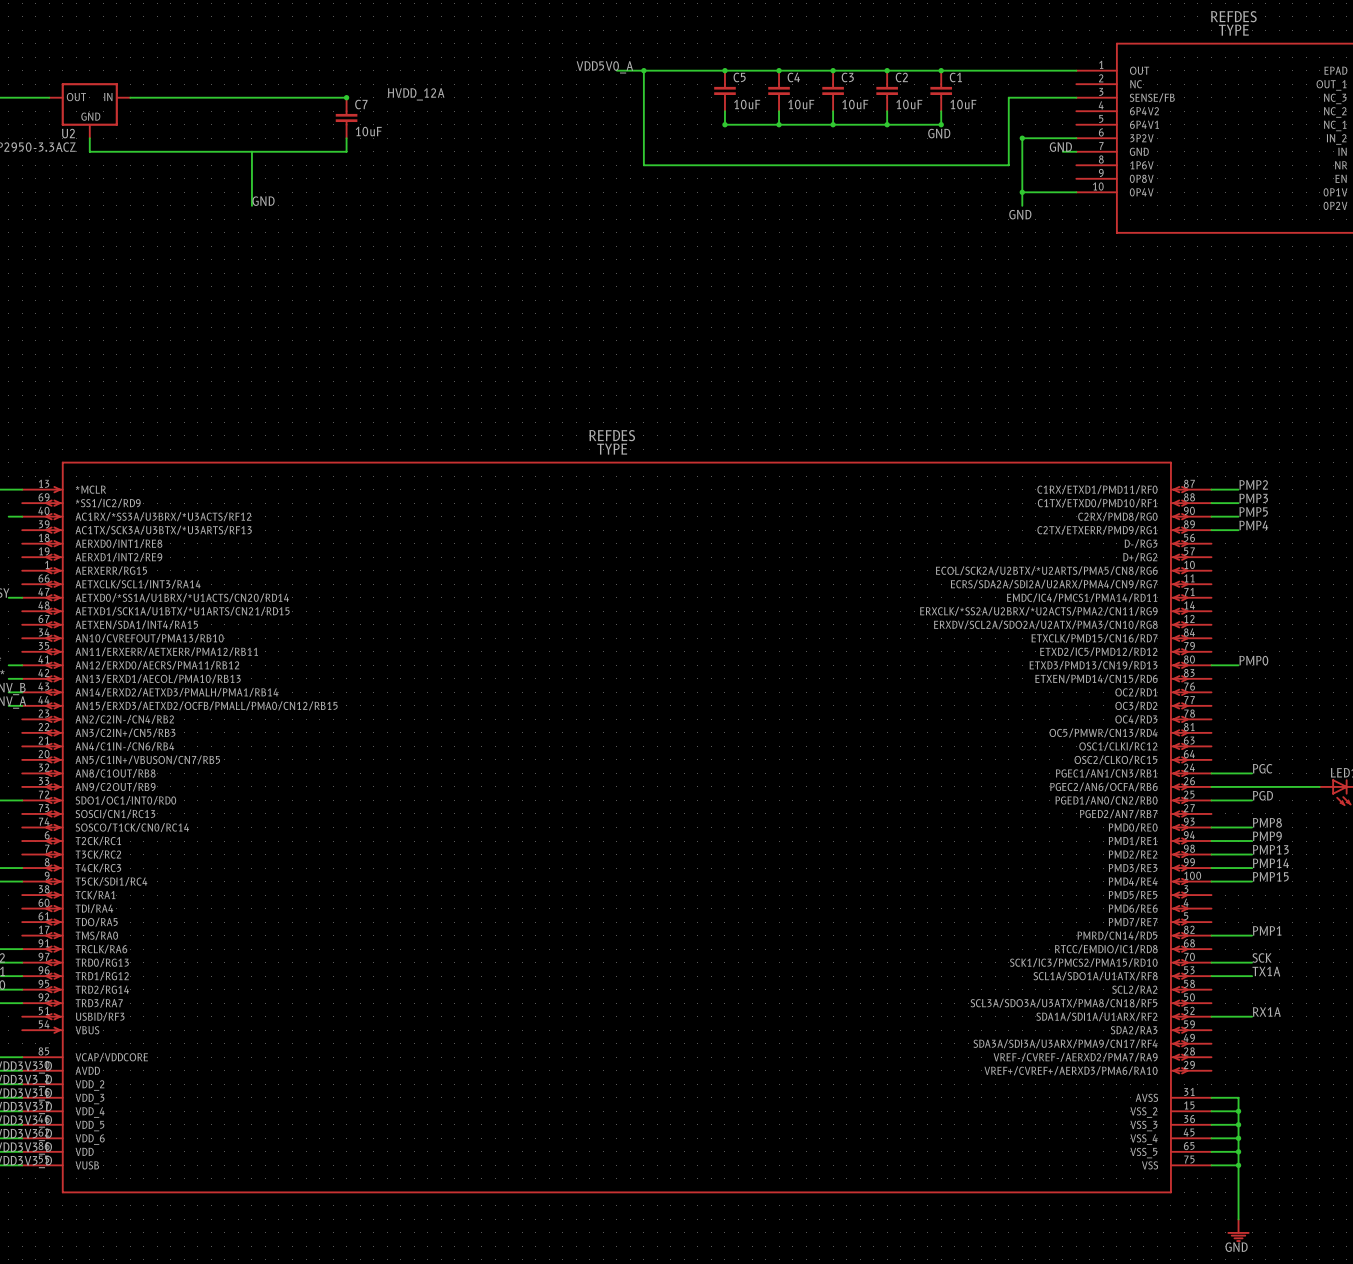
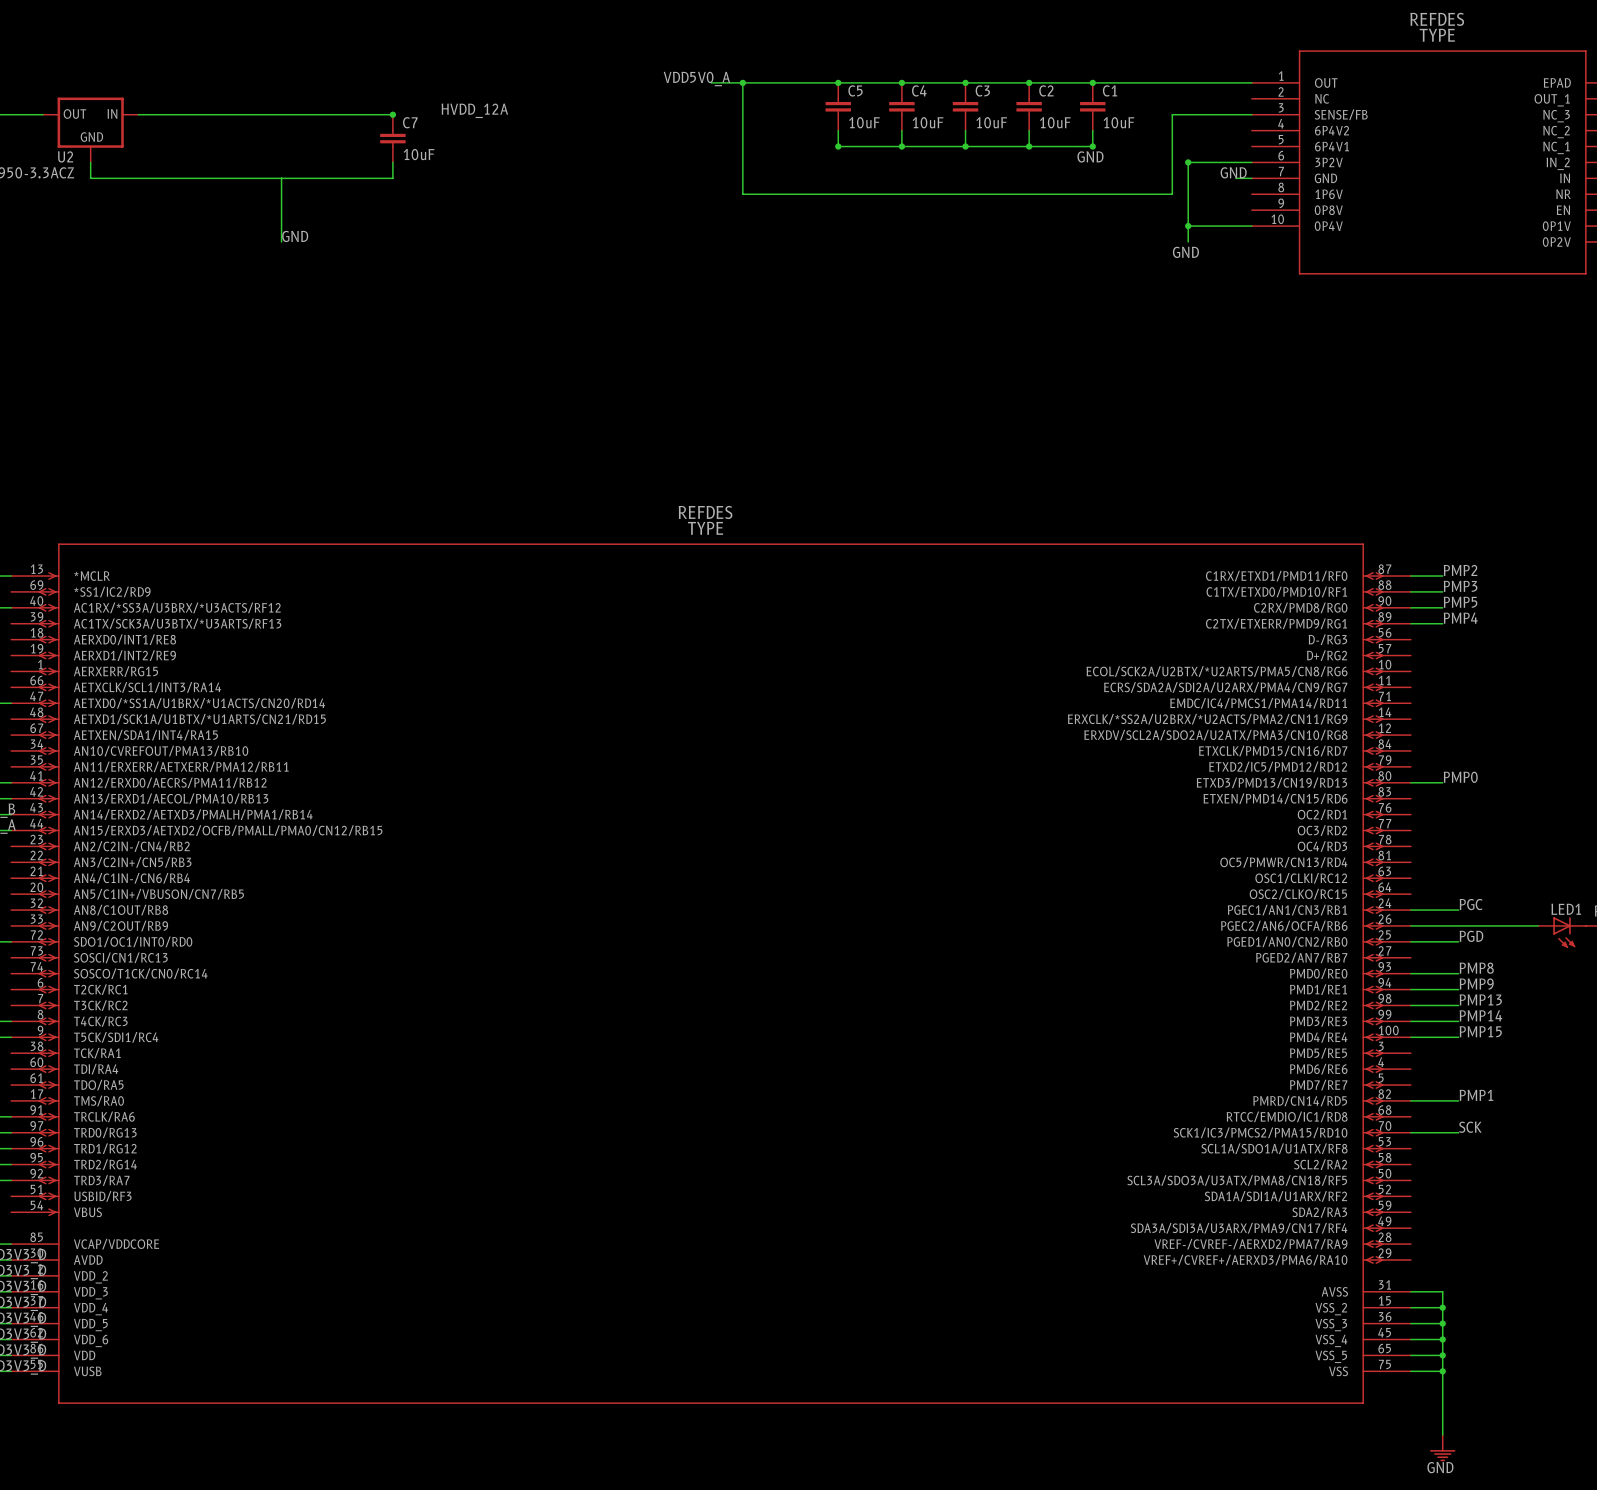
label: TX1A (1266, 971) -> none
wire: (1211, 976) (1252, 976) -> none
label: RX1A (1266, 1011) -> none
wire: (1211, 1016) (1252, 1016) -> none

